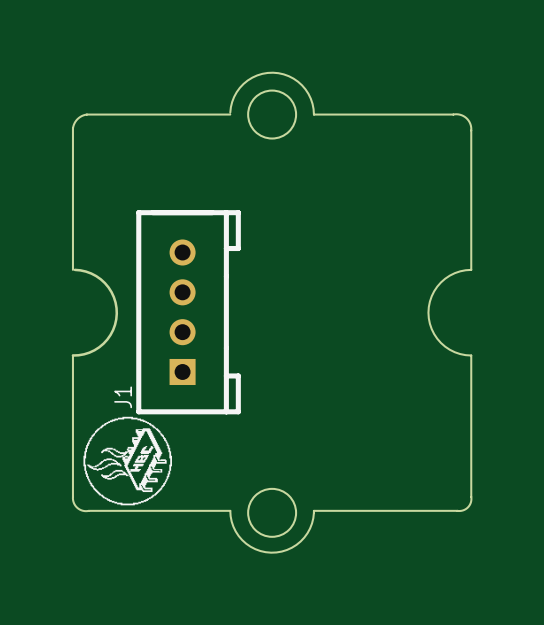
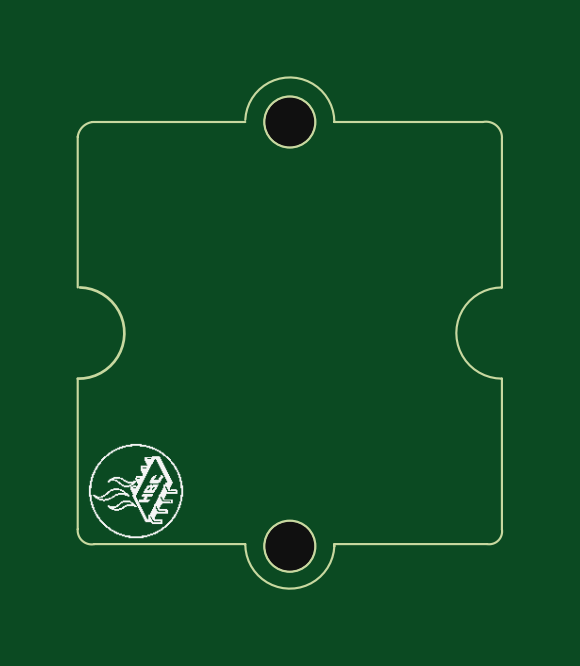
hole: none -> (289, 122)
J1: (188, 312) -> none
hole: none -> (289, 546)

